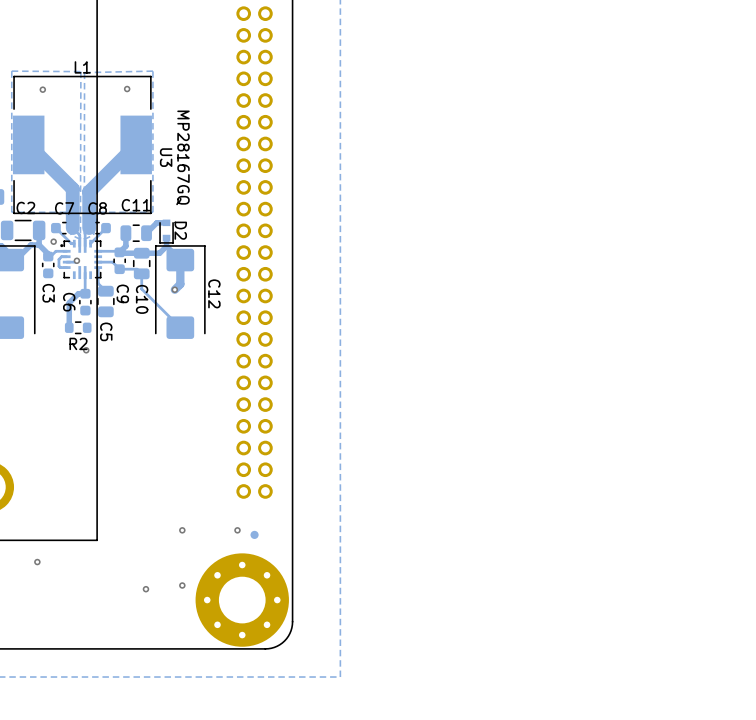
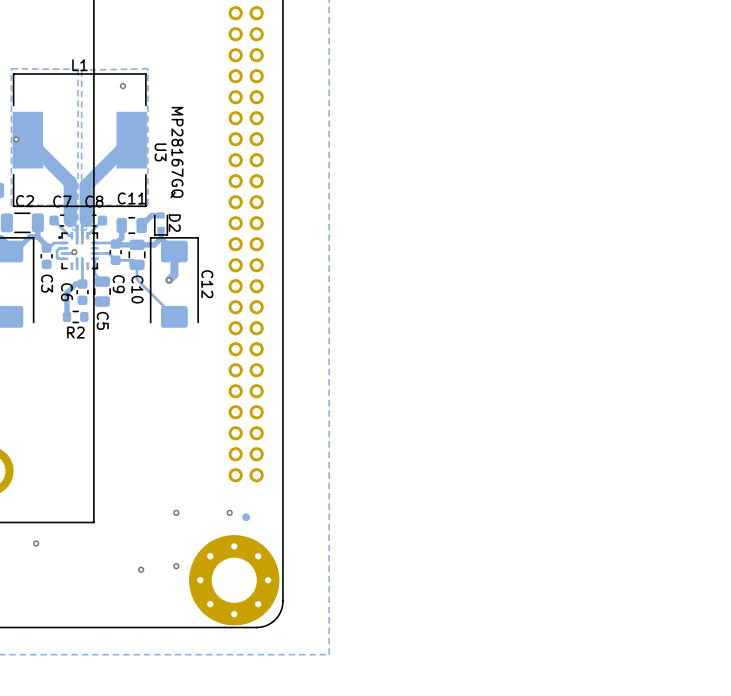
via: (42, 89) -> none
via: none -> (16, 139)
via: (53, 241) -> none
via: (86, 350) -> none

